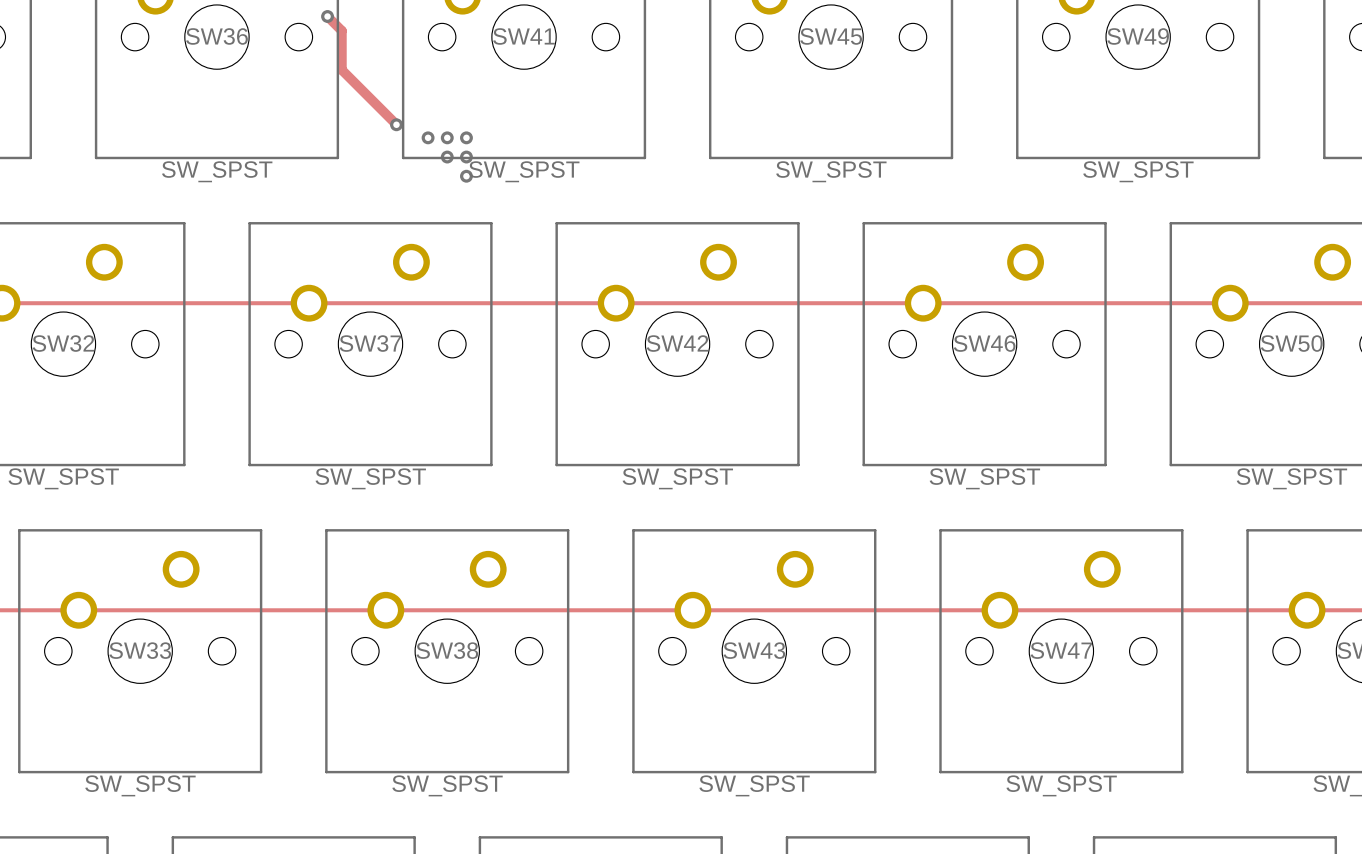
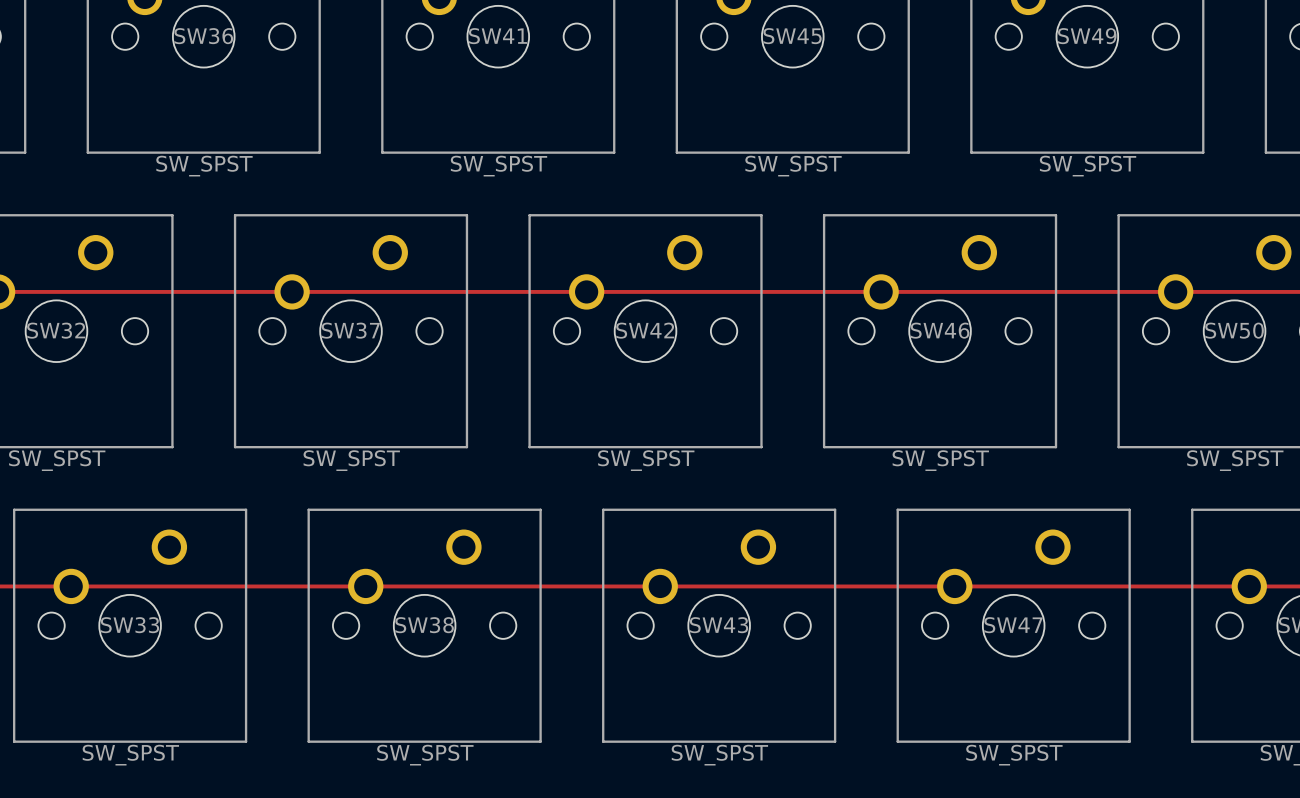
track: (327, 16) (341, 30) (341, 70) (396, 124) -> none
via: (327, 16) -> none
via: (396, 124) -> none
via: (428, 137) -> none
via: (447, 137) -> none
via: (466, 137) -> none
via: (447, 157) -> none
via: (466, 157) -> none
via: (466, 176) -> none

